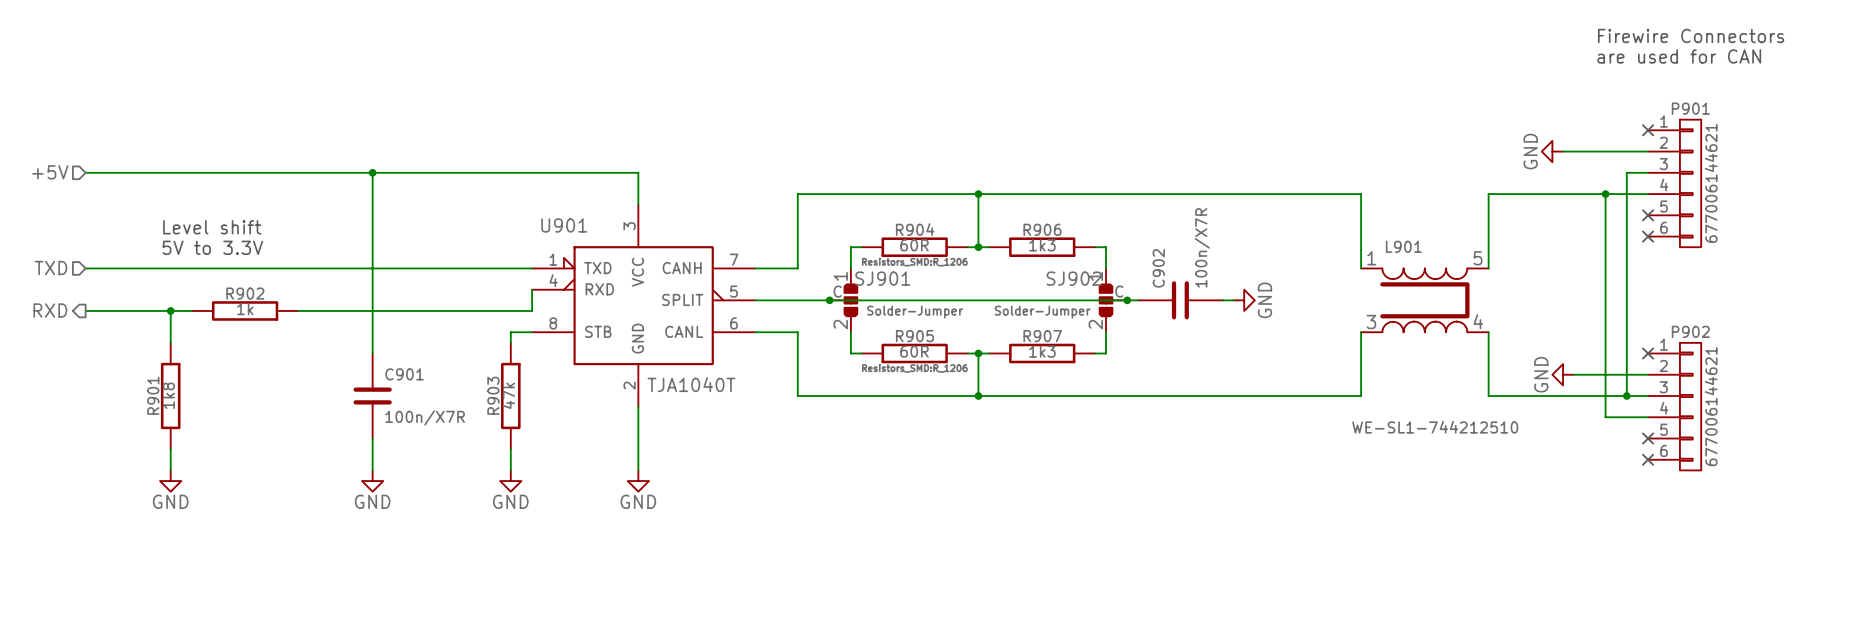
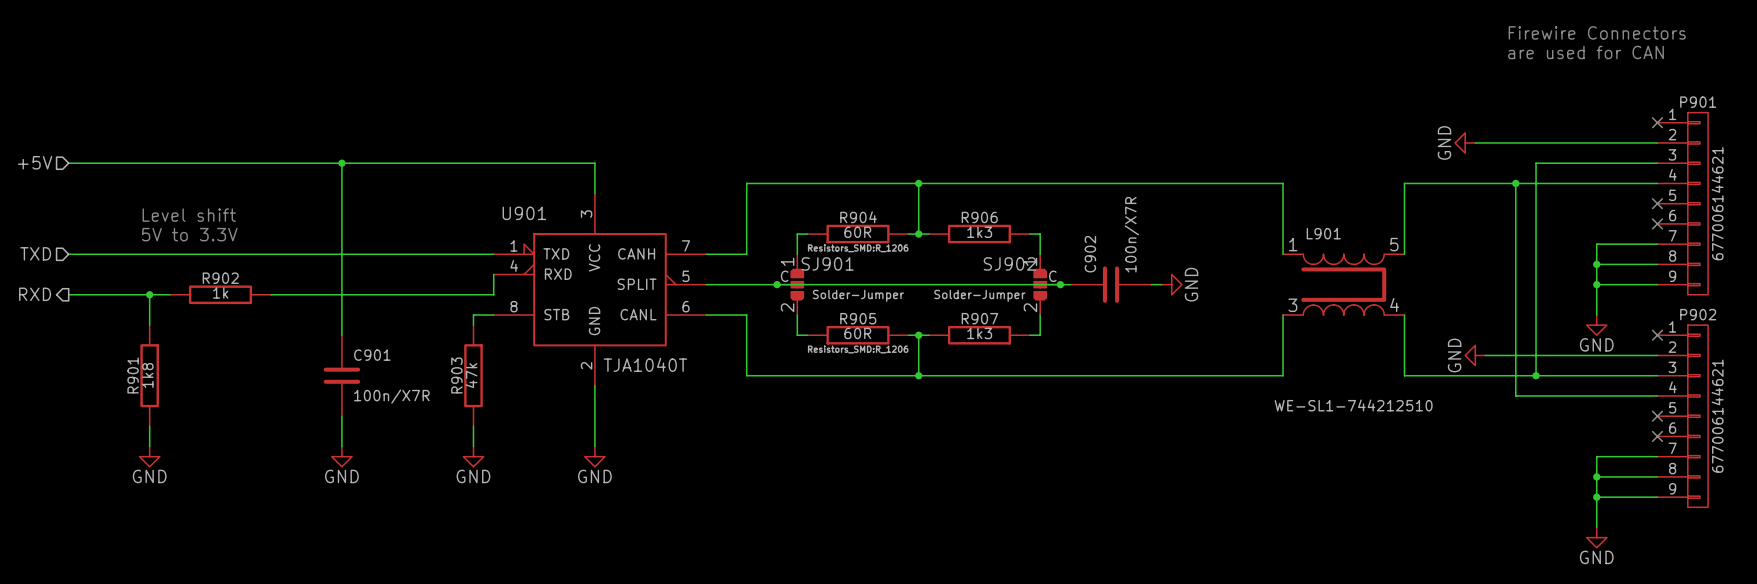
P901 name position: P901 (1690, 108) -> P901 (1698, 102)
P901 symbol: [1648, 119, 1702, 248] -> [1657, 112, 1709, 295]
no-connect mark: (1648, 130) -> none
no-connect mark: none -> (1657, 122)
wire: none -> (1556, 142) (1657, 142)
wire: none -> (1556, 163) (1657, 163)
wire: none -> (1556, 183) (1657, 183)
no-connect mark: (1648, 215) -> none
no-connect mark: none -> (1657, 203)
no-connect mark: (1648, 236) -> none
no-connect mark: none -> (1657, 223)
wire: none -> (1657, 244) (1596, 244) (1596, 315)
wire: none -> (1596, 264) (1657, 264)
junction: none -> (1596, 264)
wire: none -> (1596, 284) (1657, 284)
junction: none -> (1596, 284)
P902 name position: P902 (1690, 331) -> P902 (1698, 314)
P902 symbol: [1648, 342, 1702, 471] -> [1657, 325, 1709, 508]
power symbol: none -> GND (1596, 325)
no-connect mark: (1648, 353) -> none
no-connect mark: none -> (1657, 335)
wire: none -> (1556, 355) (1657, 355)
wire: none -> (1556, 375) (1657, 375)
wire: none -> (1556, 395) (1657, 395)
no-connect mark: (1648, 438) -> none
no-connect mark: none -> (1657, 416)
no-connect mark: (1648, 459) -> none
no-connect mark: none -> (1657, 436)
wire: none -> (1657, 456) (1596, 456) (1596, 527)
wire: none -> (1596, 476) (1657, 476)
junction: none -> (1596, 476)
wire: none -> (1596, 497) (1657, 497)
junction: none -> (1596, 497)
power symbol: none -> GND (1596, 537)

